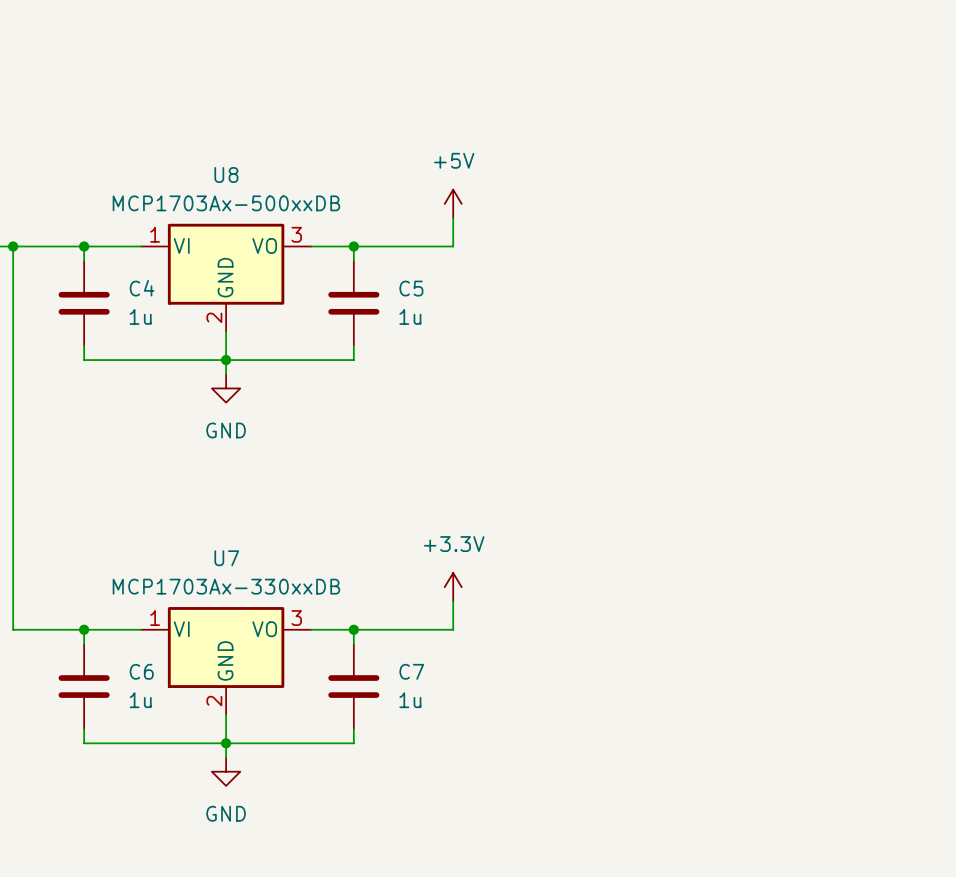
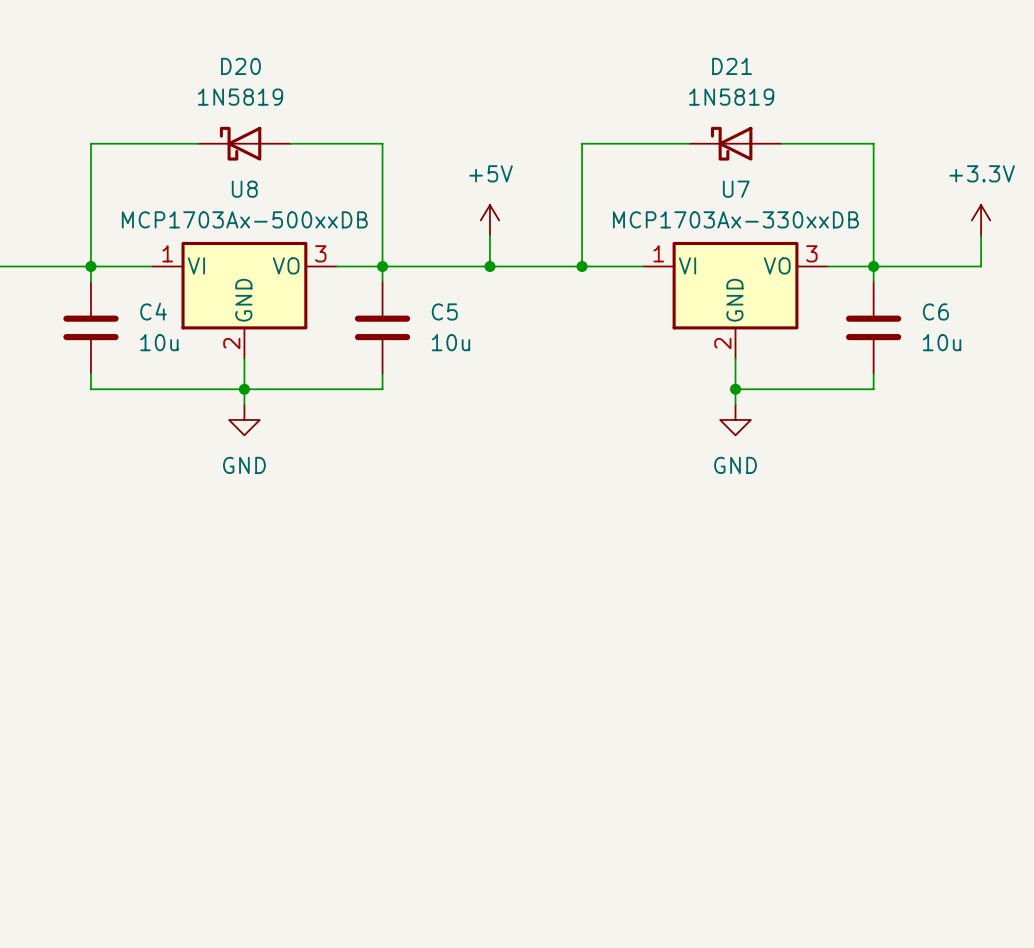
wire: none -> (198, 143) (90, 143) (90, 266)
D20: none -> 1N5819 (244, 143)
wire: none -> (290, 143) (382, 143) (382, 266)
wire: none -> (689, 143) (582, 143) (582, 266)
D21: none -> 1N5819 (735, 143)
wire: none -> (781, 143) (873, 143) (873, 281)
power symbol: none -> +3.3V (981, 220)
wire: none -> (981, 235) (981, 266) (827, 266)
wire: (13, 246) (13, 629) (140, 629) -> none
junction: (13, 246) -> none
wire: none -> (489, 266) (643, 266)
junction: none -> (489, 266)
junction: none -> (582, 266)
junction: none -> (873, 266)
C4 value: 1u (140, 316) -> 10u (159, 342)
C5 value: 1u (410, 316) -> 10u (450, 342)
wire: none -> (735, 358) (735, 404)
wire: none -> (873, 373) (873, 389) (735, 389)
junction: none -> (735, 389)
power symbol: none -> GND (735, 419)
power symbol: +3.3V (453, 587) -> none
wire: (453, 601) (453, 629) (311, 629) -> none
wire: (84, 629) (84, 643) -> none
junction: (84, 629) -> none
wire: (353, 629) (353, 643) -> none
junction: (353, 629) -> none
U7 position: (226, 660) -> (735, 300)
C6 position: (84, 686) -> (873, 327)
C7: 1u (353, 686) -> none
C6 value: 1u (140, 700) -> 10u (942, 342)
wire: (226, 714) (226, 757) -> none
wire: (84, 729) (84, 743) (353, 743) (353, 729) -> none
junction: (226, 743) -> none
power symbol: GND (226, 771) -> none

